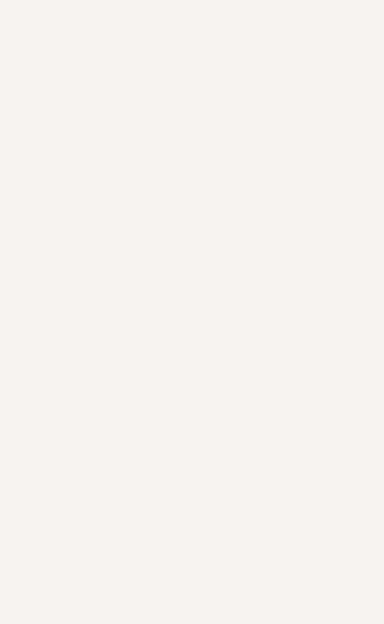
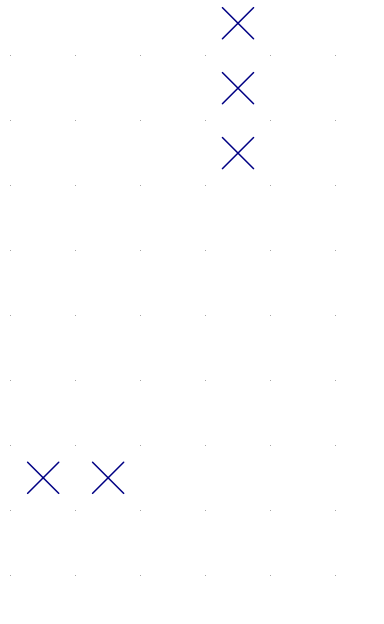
no-connect mark: none -> (237, 23)
no-connect mark: none -> (237, 88)
no-connect mark: none -> (237, 153)
no-connect mark: none -> (43, 477)
no-connect mark: none -> (108, 477)

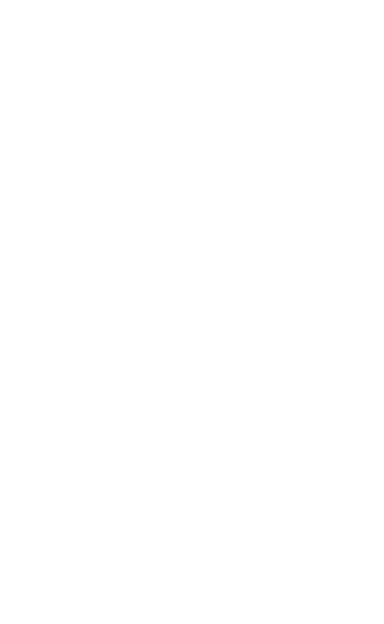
no-connect mark: (237, 23) -> none
no-connect mark: (237, 88) -> none
no-connect mark: (237, 153) -> none
no-connect mark: (43, 477) -> none
no-connect mark: (108, 477) -> none

